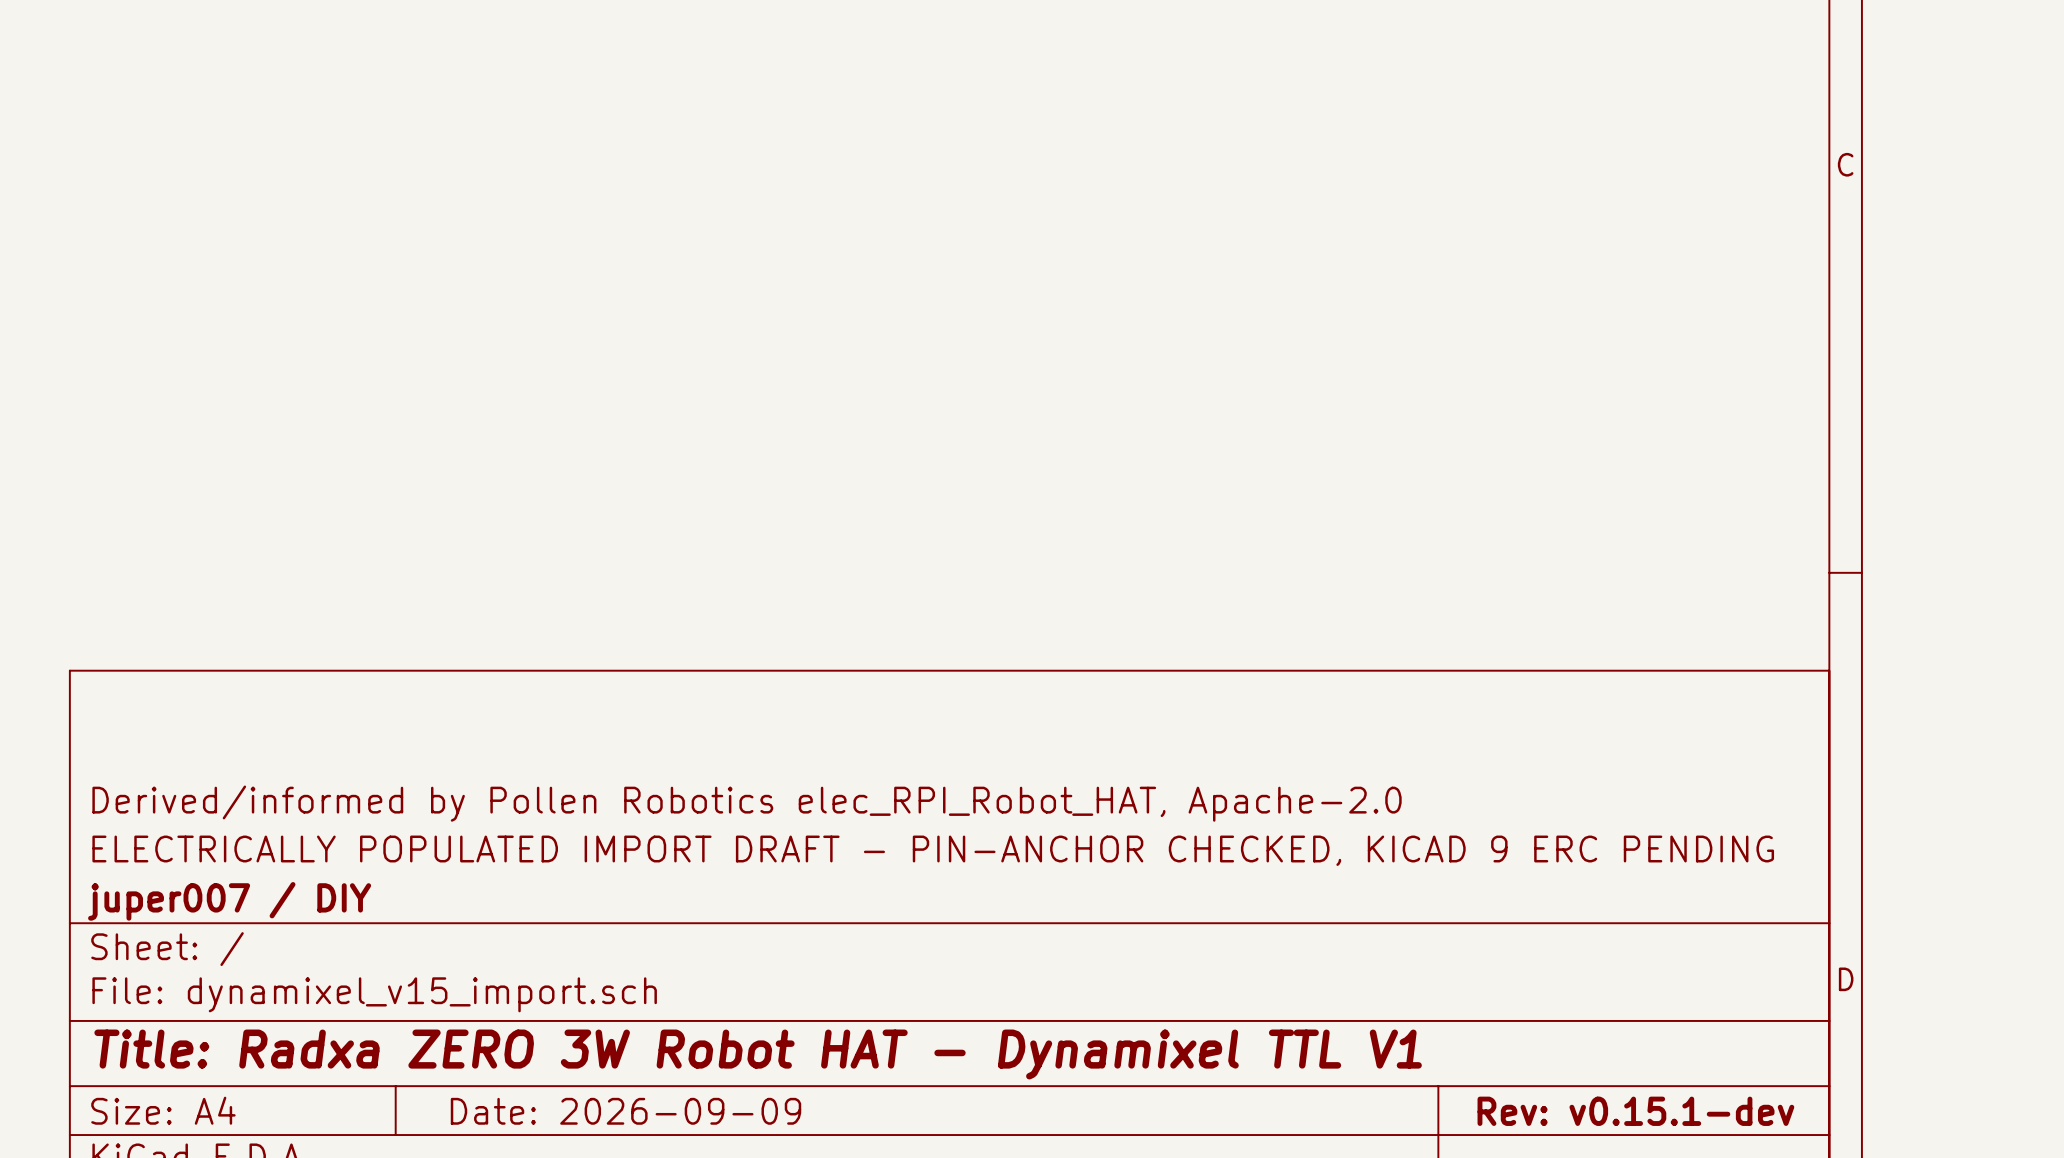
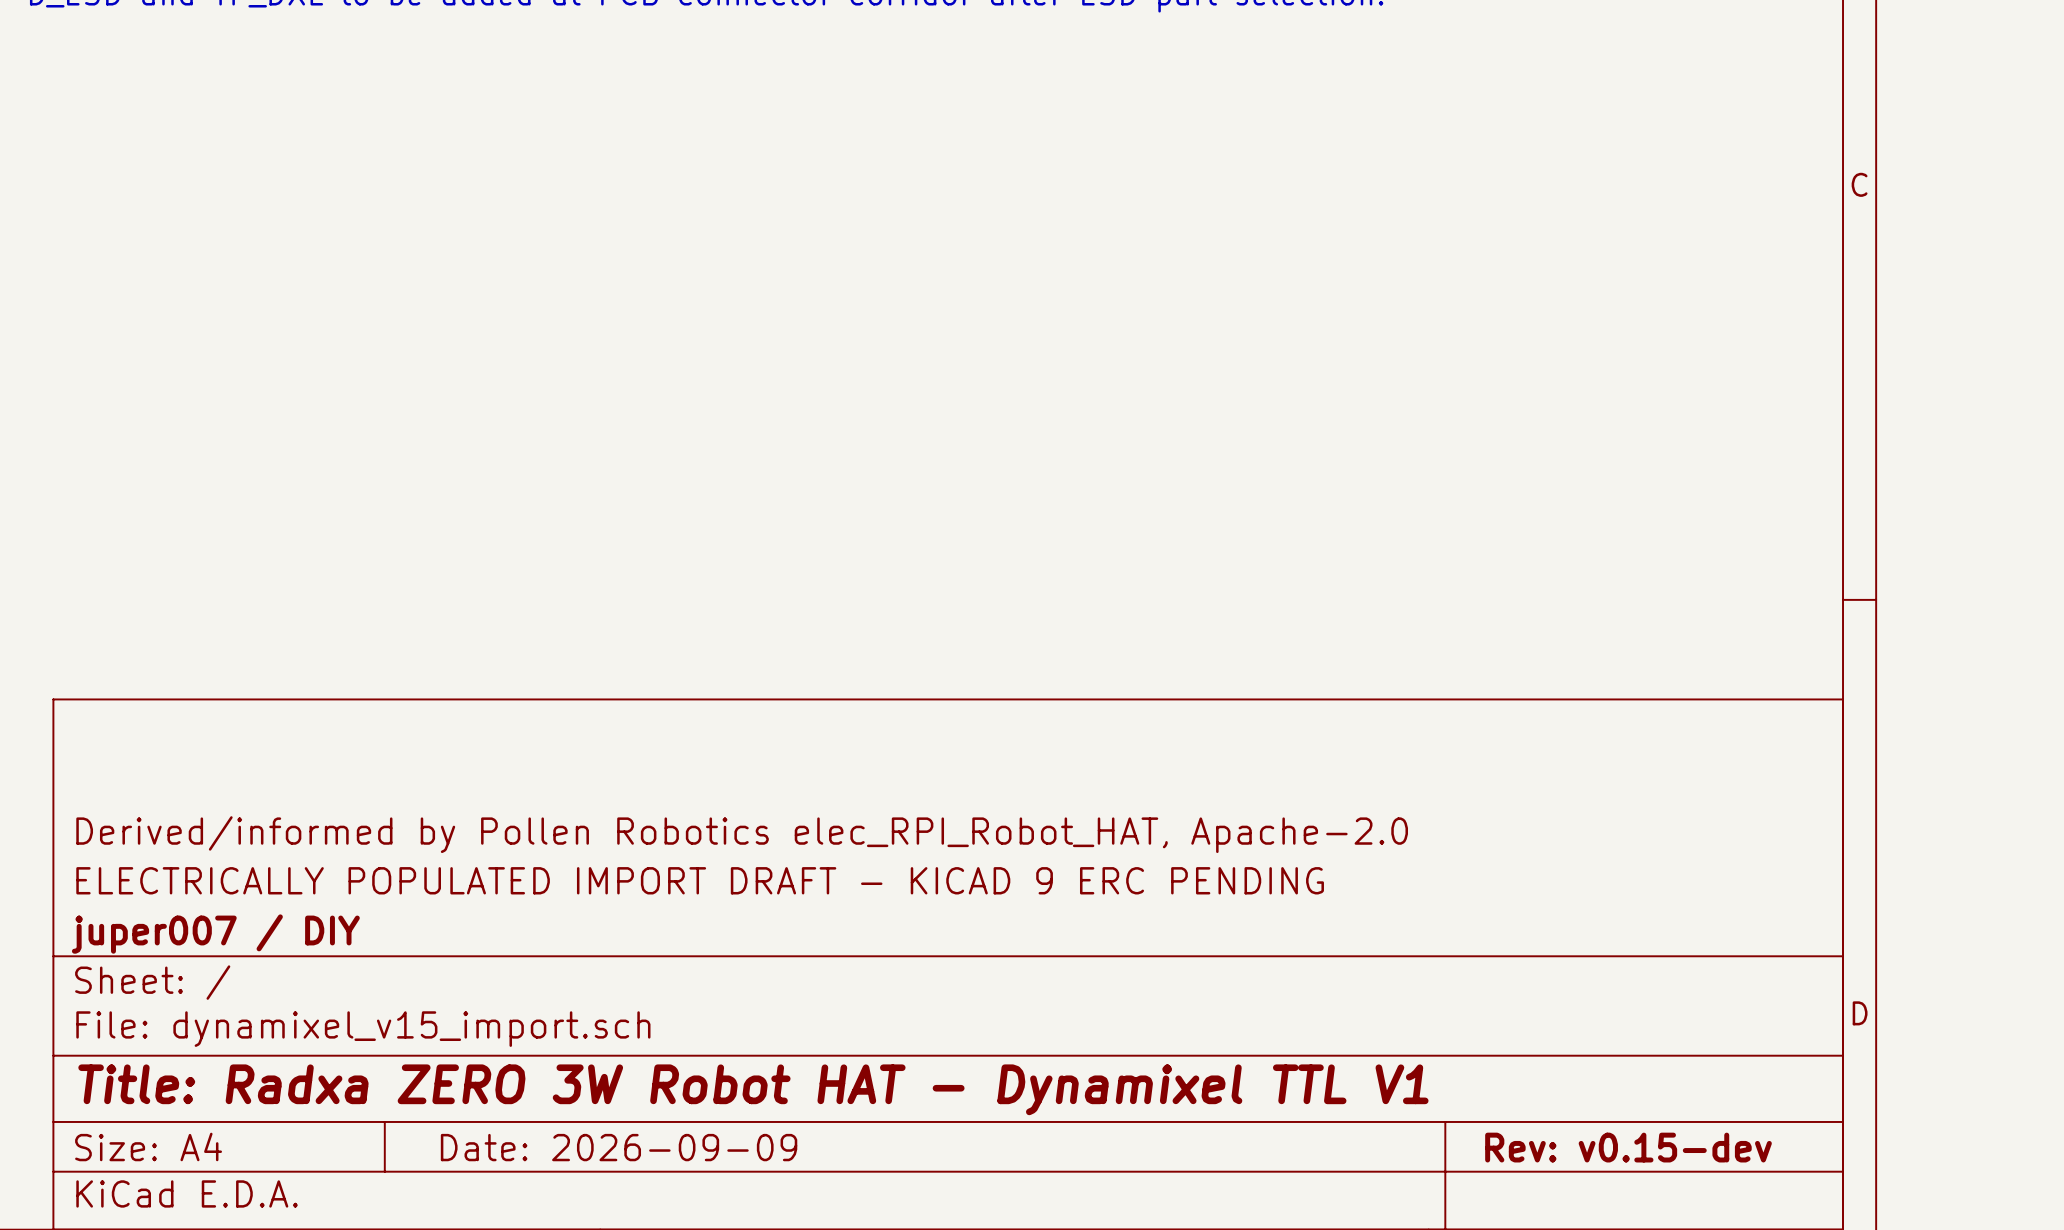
title block: ELECTRICALLY POPULATED IMPORT DRAFT - PIN-ANCHOR CHECKED, KICAD 9 ERC PENDING (933, 850) -> ELECTRICALLY POPULATED IMPORT DRAFT - KICAD 9 ERC PENDING (700, 880)
title block: Rev: v0.15.1-dev (1635, 1111) -> Rev: v0.15-dev (1628, 1147)

